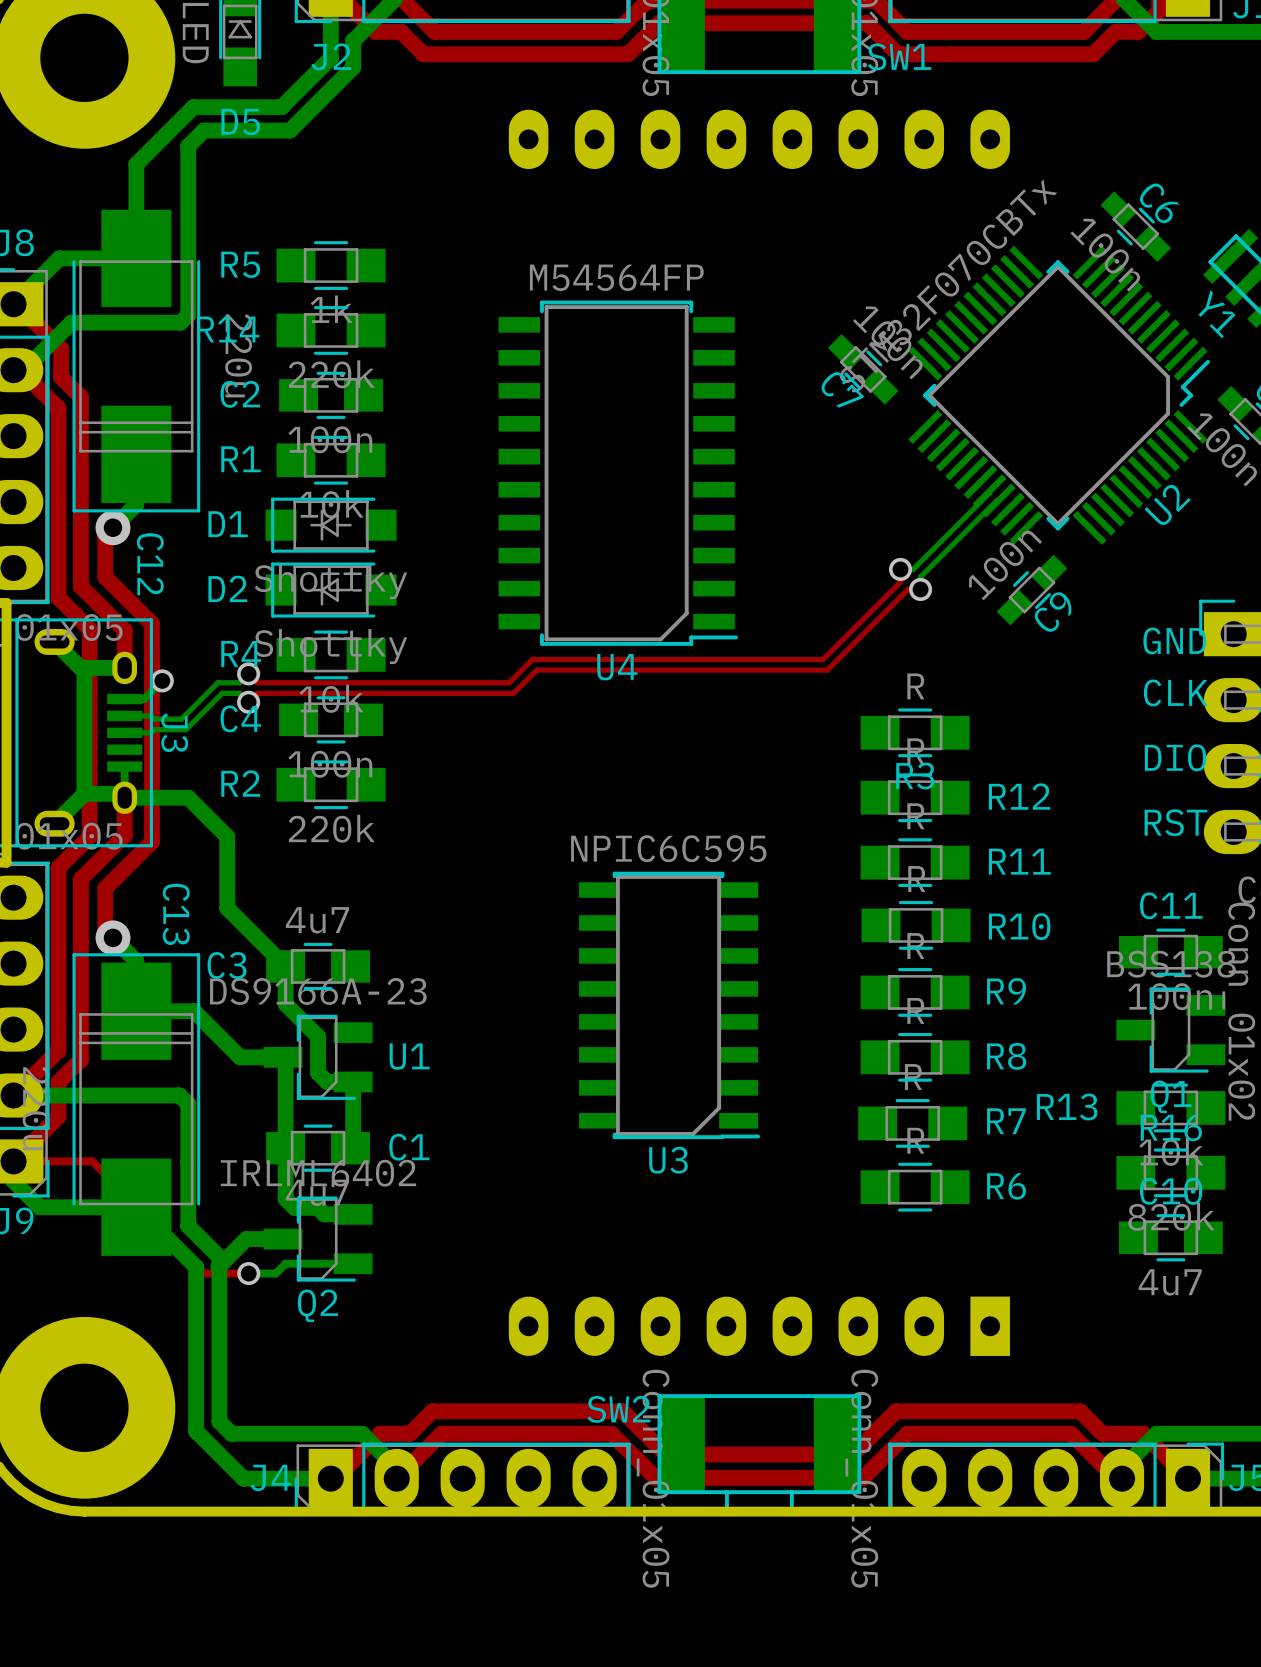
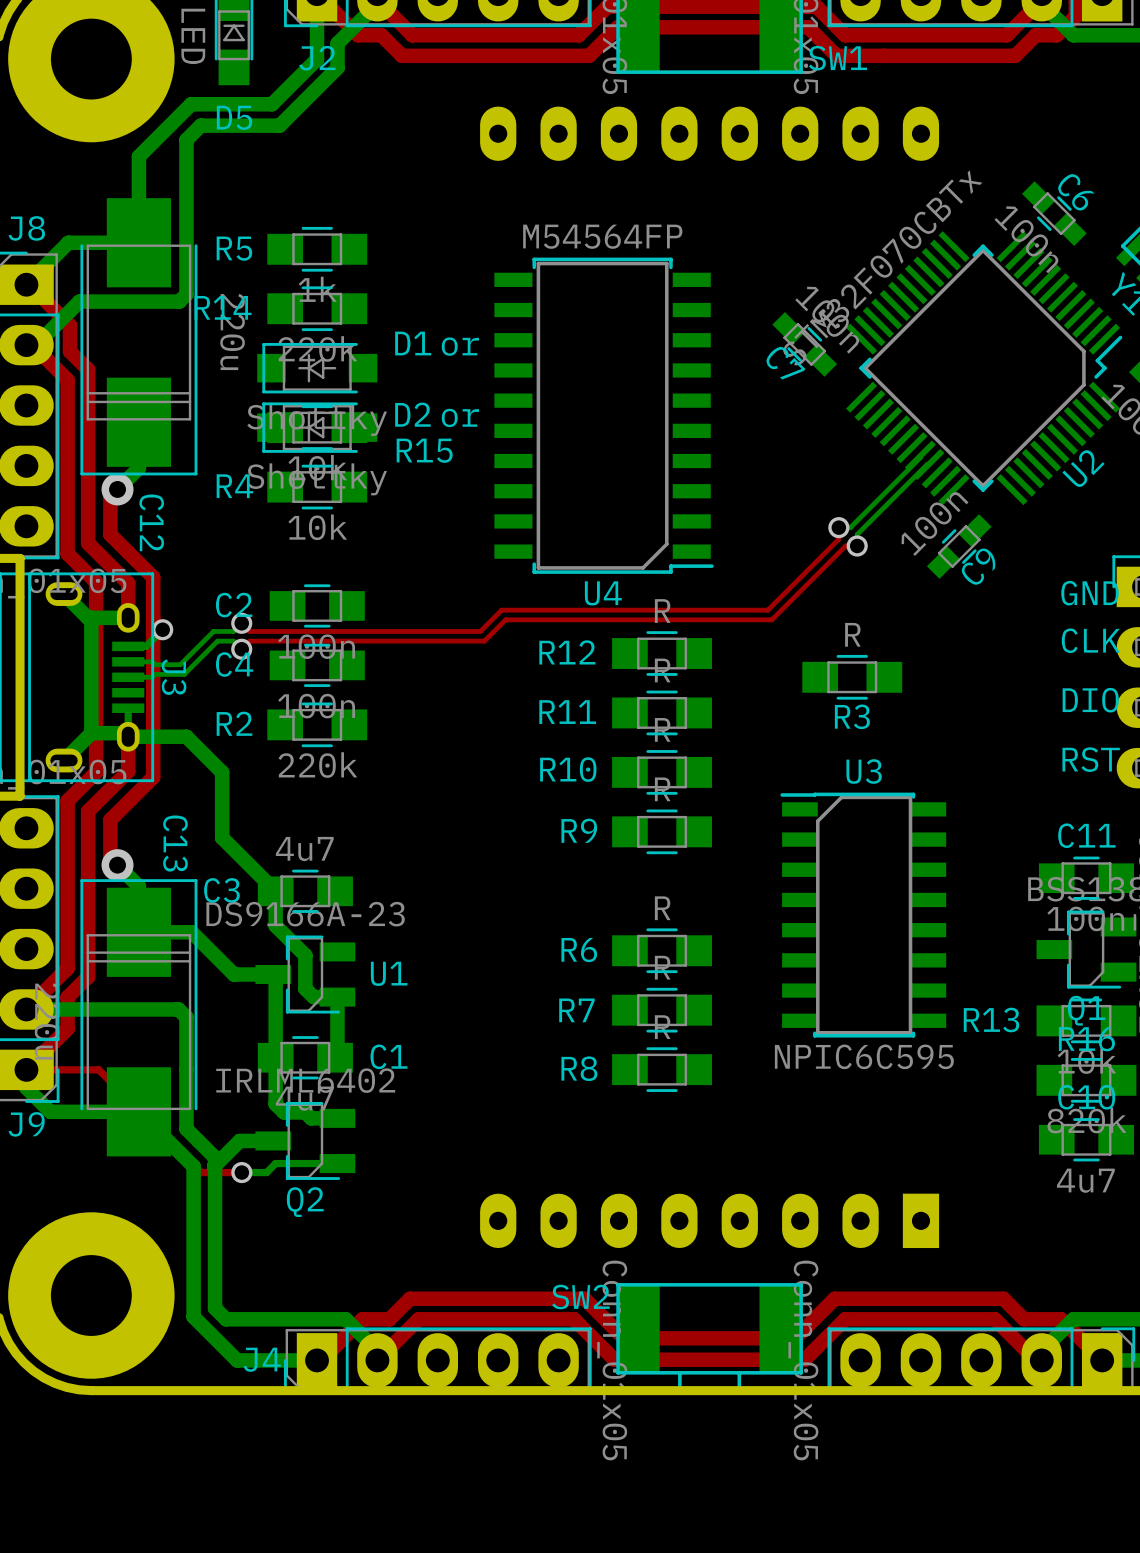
text: none -> or (460, 346)
C2 position: (331, 395) -> (317, 605)
text: none -> or (460, 417)
R1 name: R1 (240, 459) -> R15 (424, 450)
U4 position: (618, 473) -> (604, 415)
D1 name position: D1 (228, 524) -> D1 (413, 343)
D1 position: (331, 525) -> (317, 368)
D2 name position: D2 (227, 588) -> D2 (412, 414)
D2 position: (331, 590) -> (317, 427)
R4 position: (331, 654) -> (317, 487)
R12 name position: R12 (1019, 796) -> R12 (567, 652)
R12 position: (915, 797) -> (662, 653)
R11 name position: R11 (1019, 861) -> R11 (567, 712)
R11 position: (915, 862) -> (662, 712)
R10 position: (916, 925) -> (662, 772)
R10 name position: R10 (1019, 926) -> R10 (568, 769)
R9 name position: R9 (1006, 991) -> R9 (579, 830)
R9 position: (915, 992) -> (662, 831)
U3 rotation: 0° (669, 1005) -> 180° (863, 915)
U3 position: (669, 1005) -> (863, 915)
R8 name position: R8 (1006, 1056) -> R8 (579, 1068)
R8 position: (915, 1057) -> (662, 1069)
R7 name position: R7 (1006, 1121) -> R7 (576, 1010)
R7 position: (912, 1123) -> (662, 1010)
R6 name position: R6 (1006, 1186) -> R6 (579, 950)
R6 position: (915, 1187) -> (662, 950)

